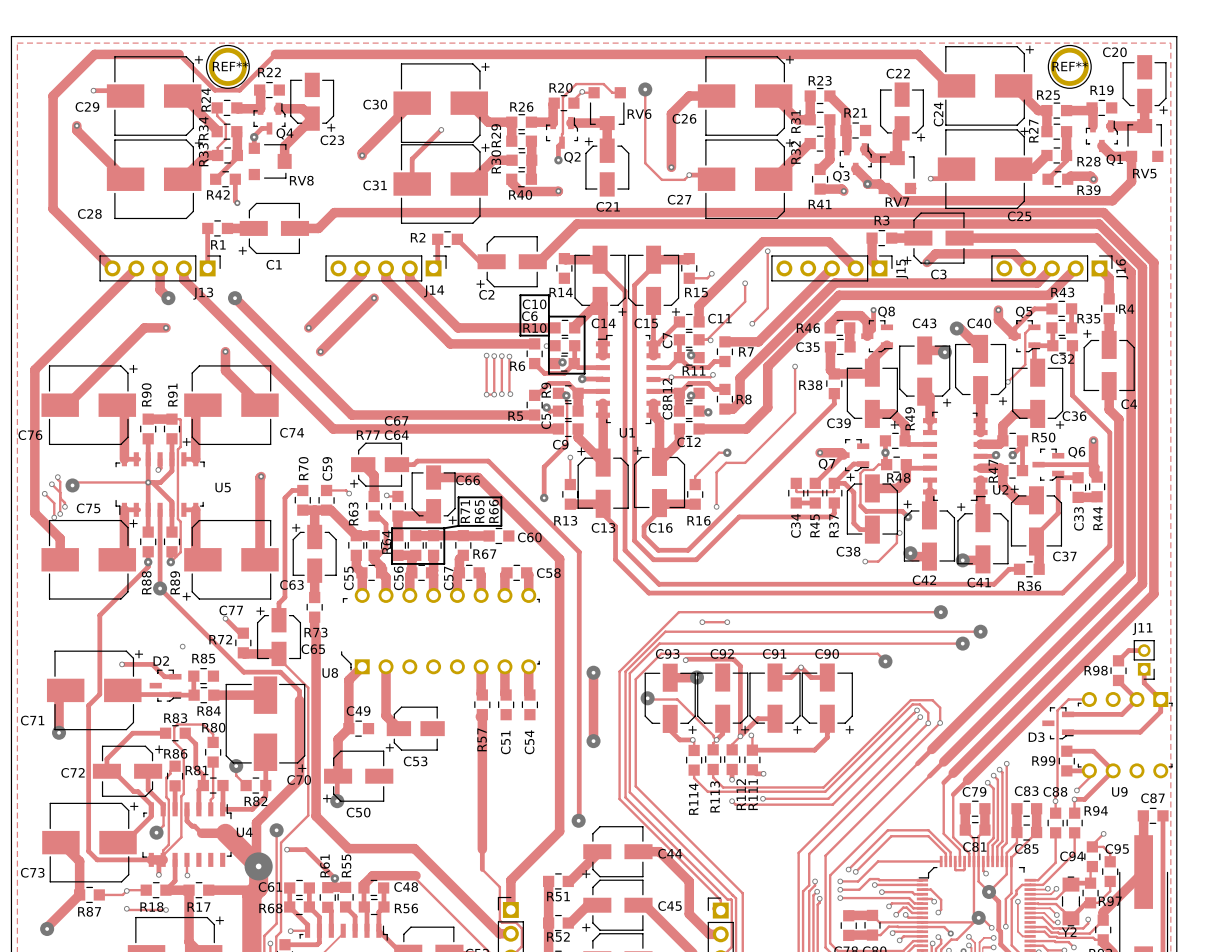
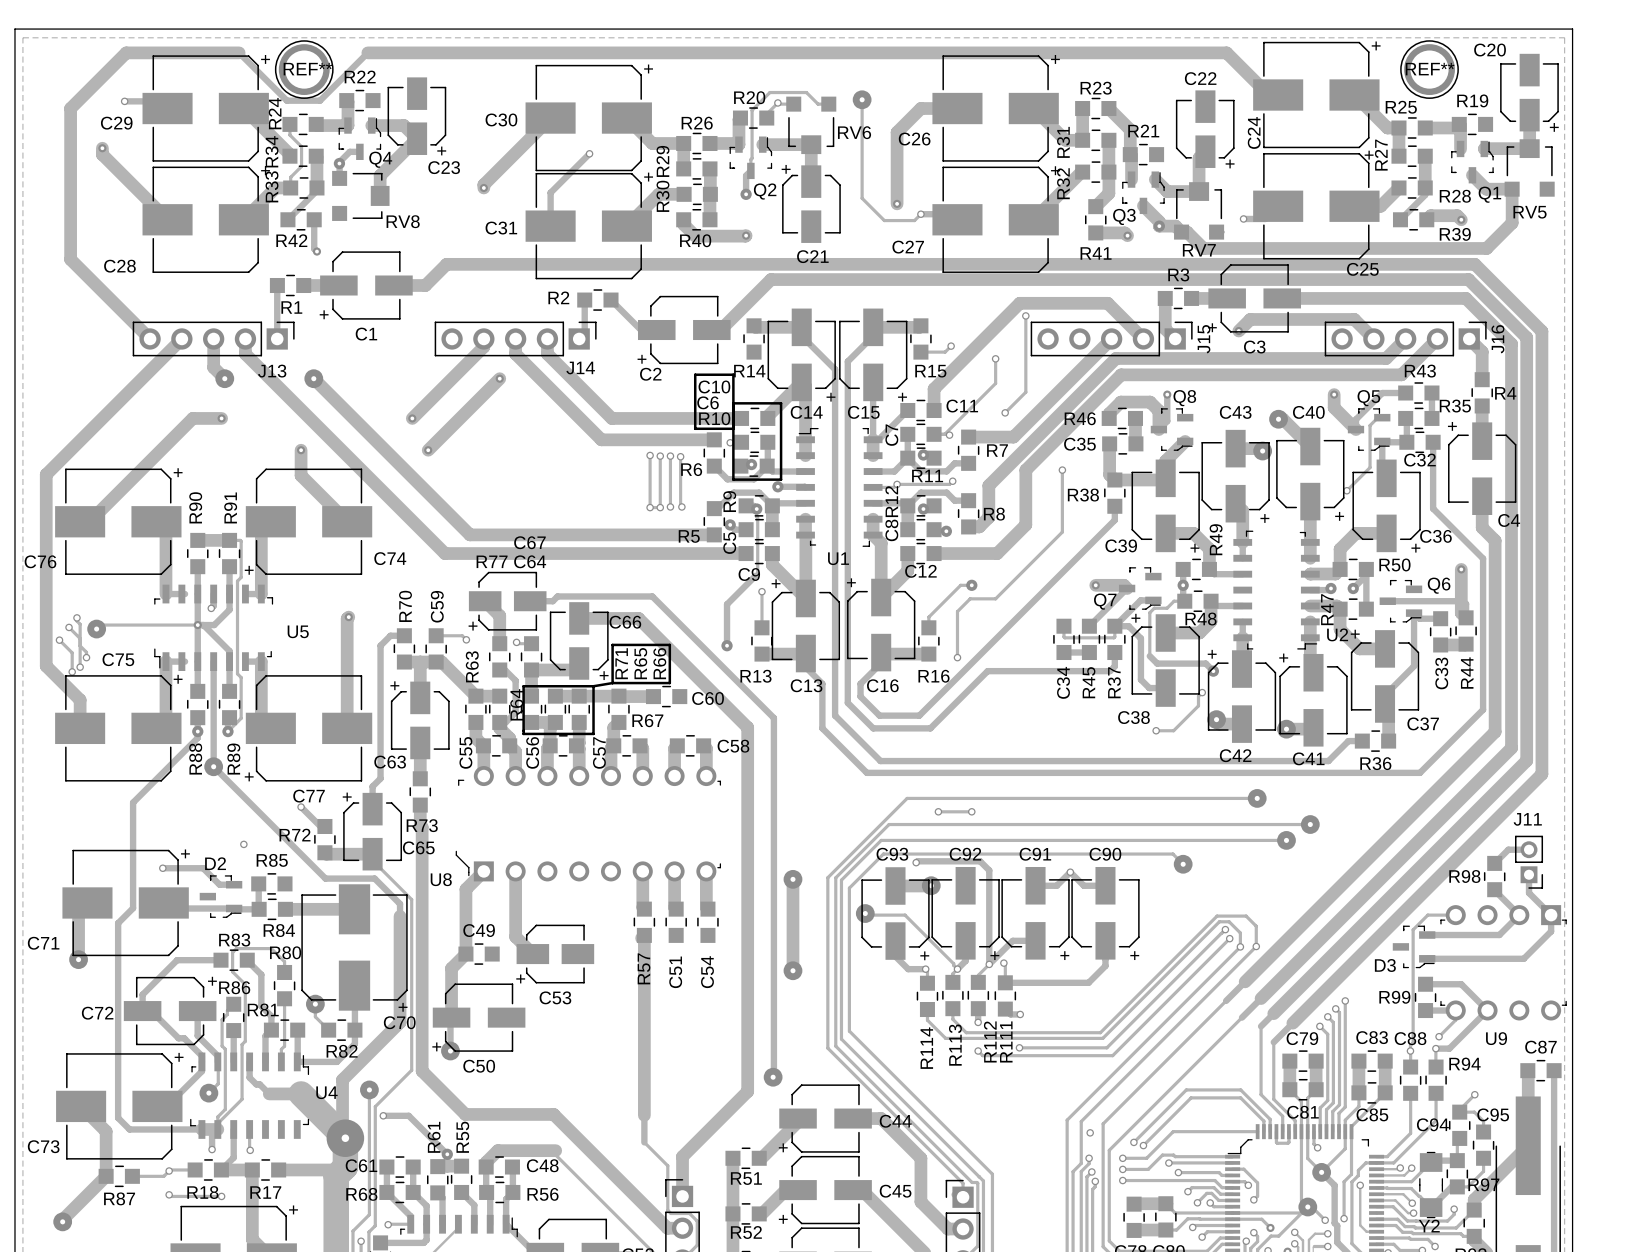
via: none -> (1090, 1132)

